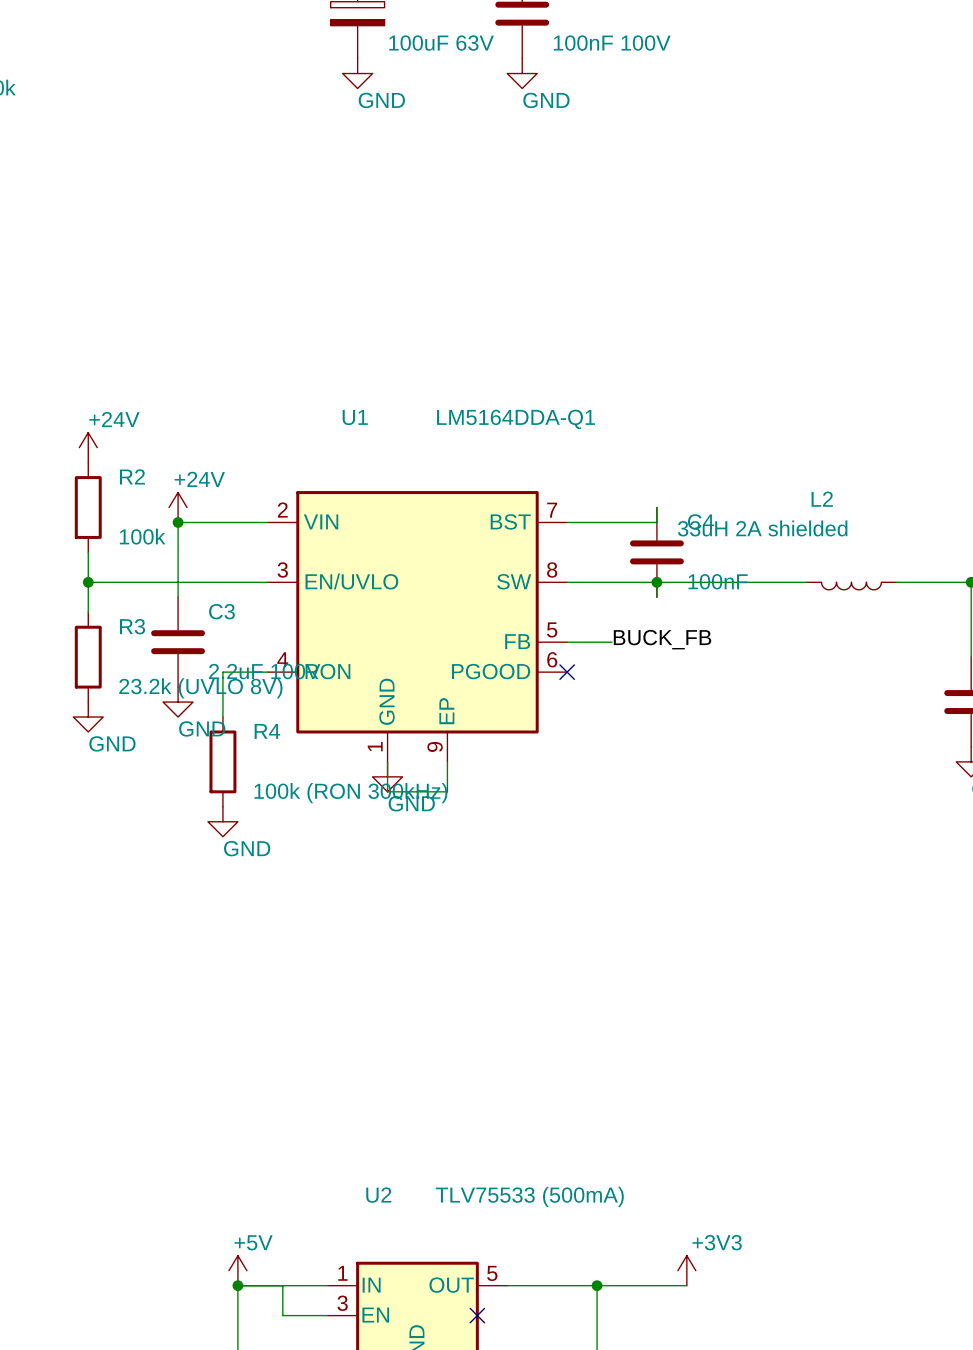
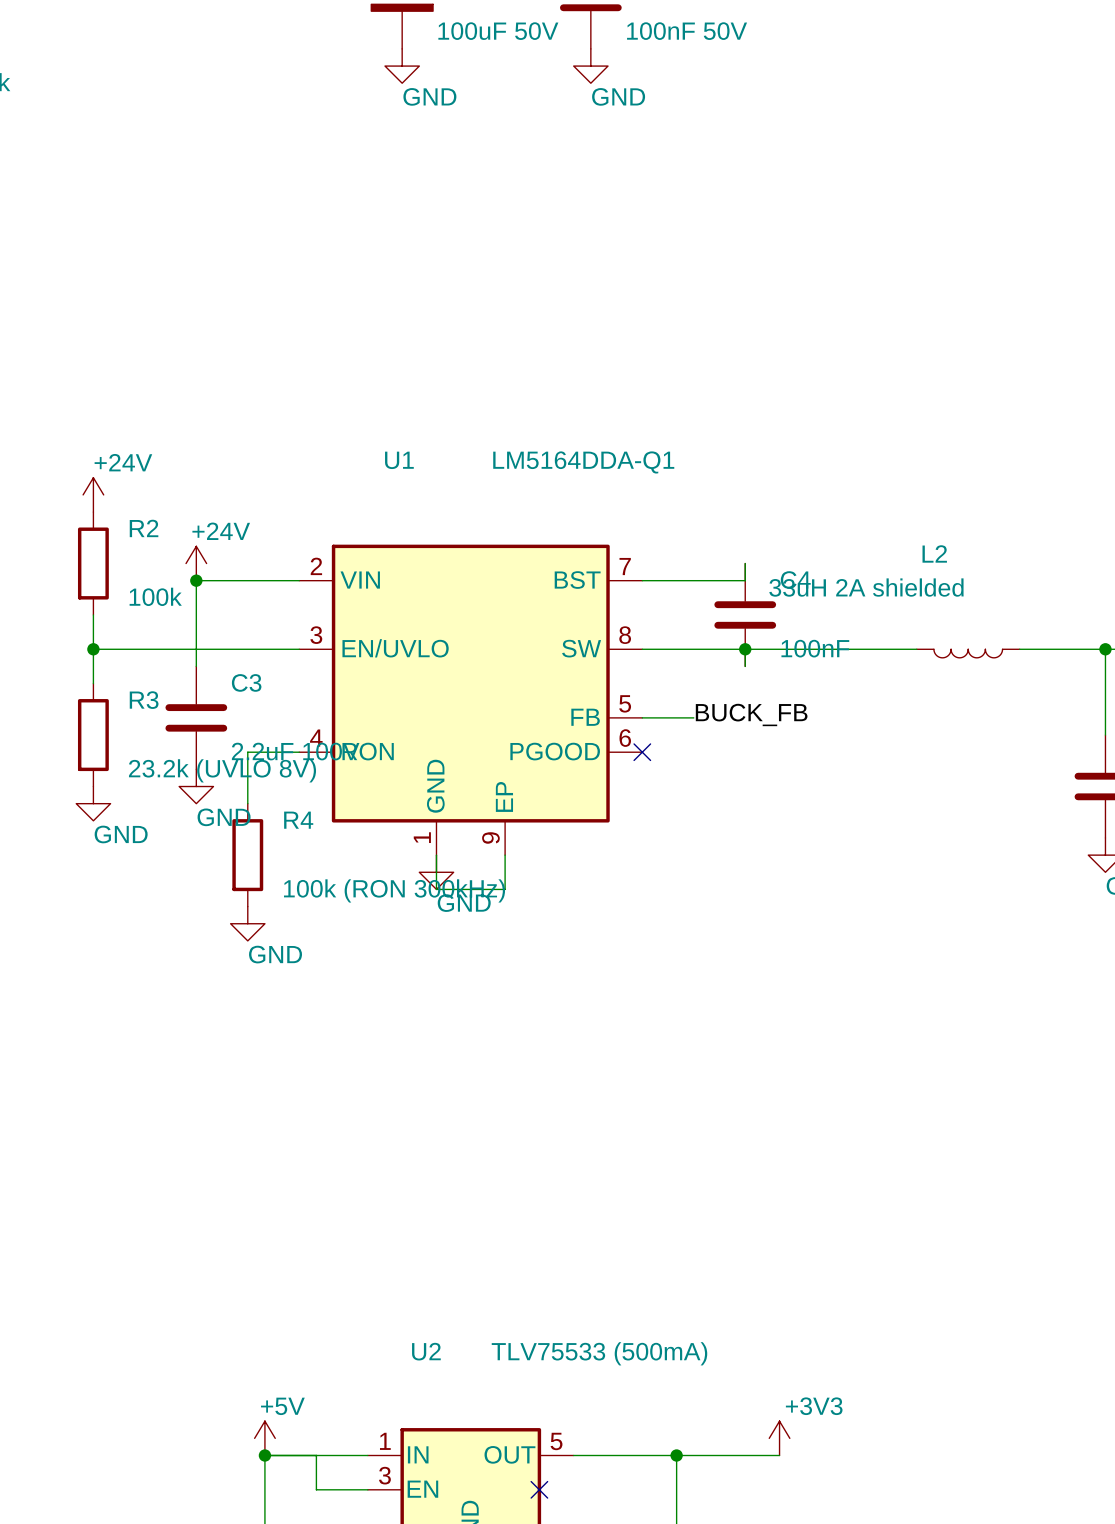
part value: 100uF 63V (441, 43) -> 100uF 50V (498, 31)
part value: 100nF 100V (612, 43) -> 100nF 50V (687, 31)

